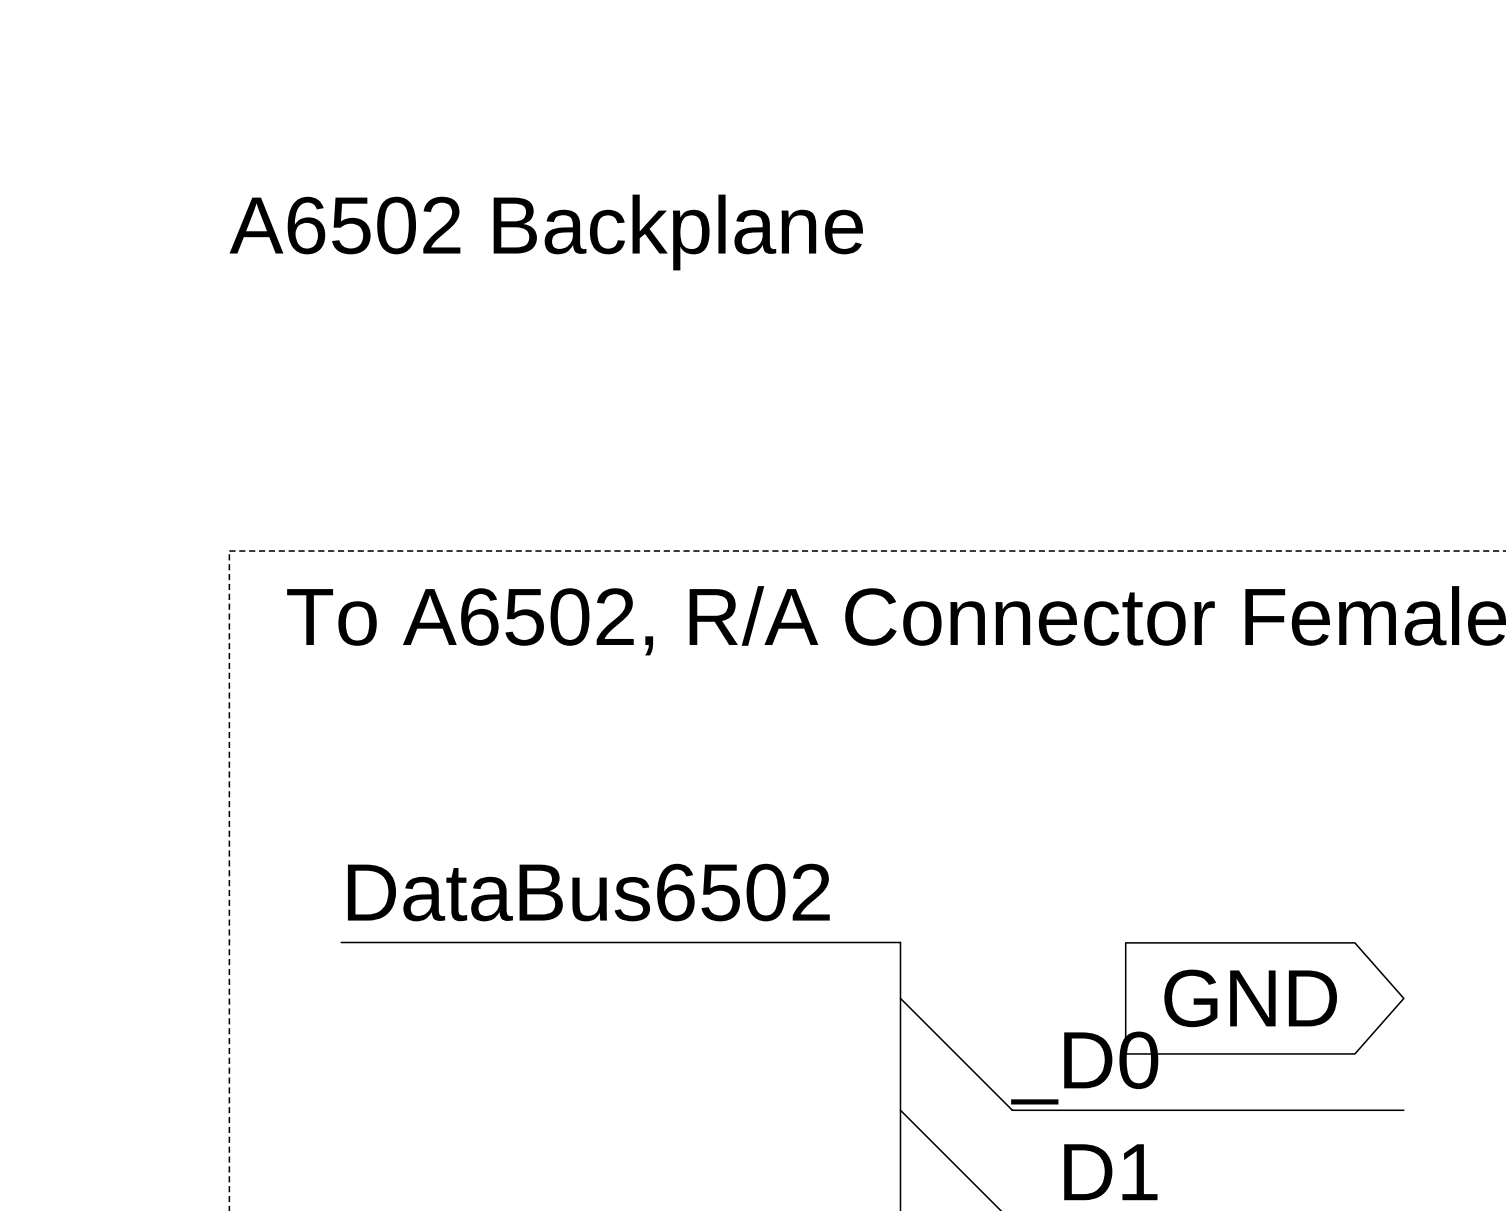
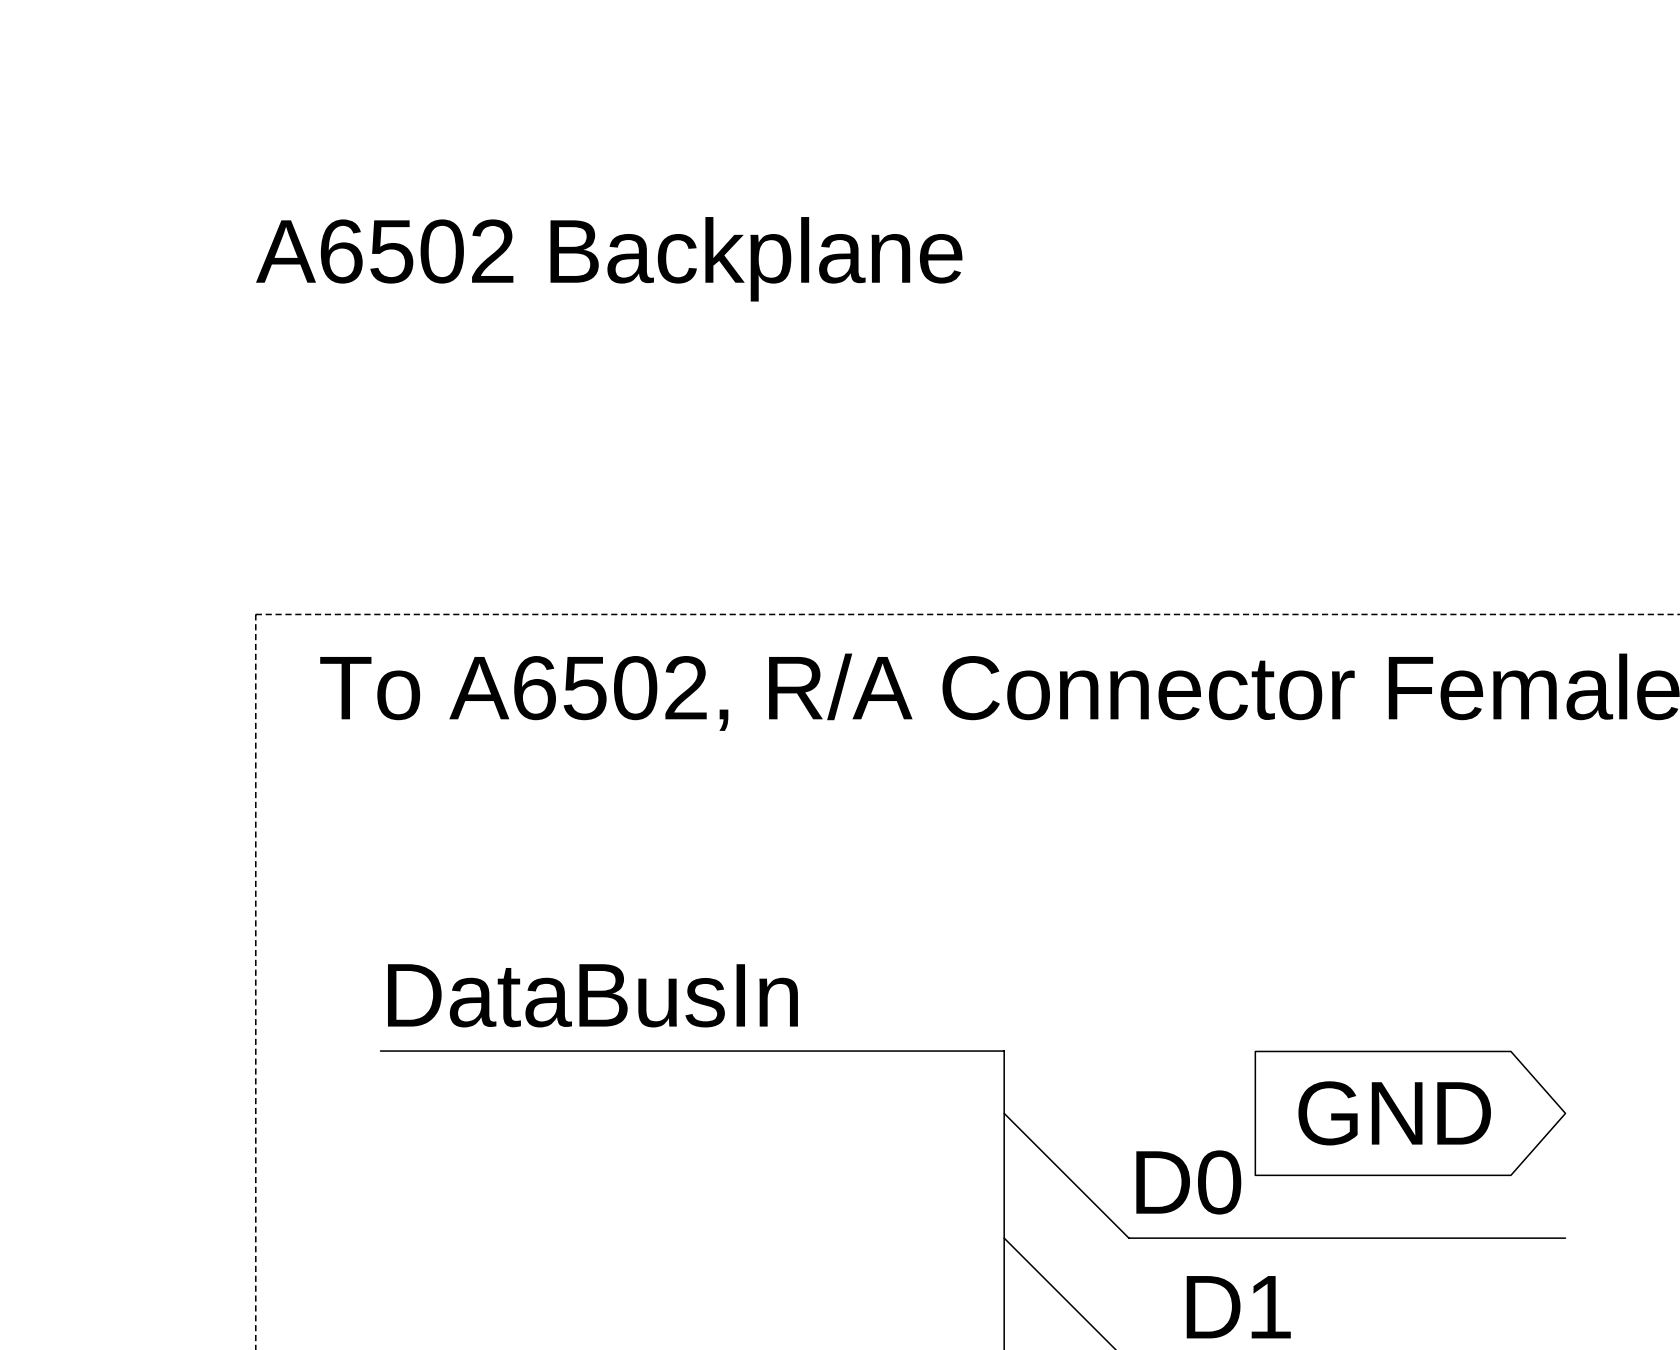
label: DataBus6502 (588, 892) -> DataBusIn (592, 995)
label: _D0 (1084, 1068) -> D0 (1188, 1182)

